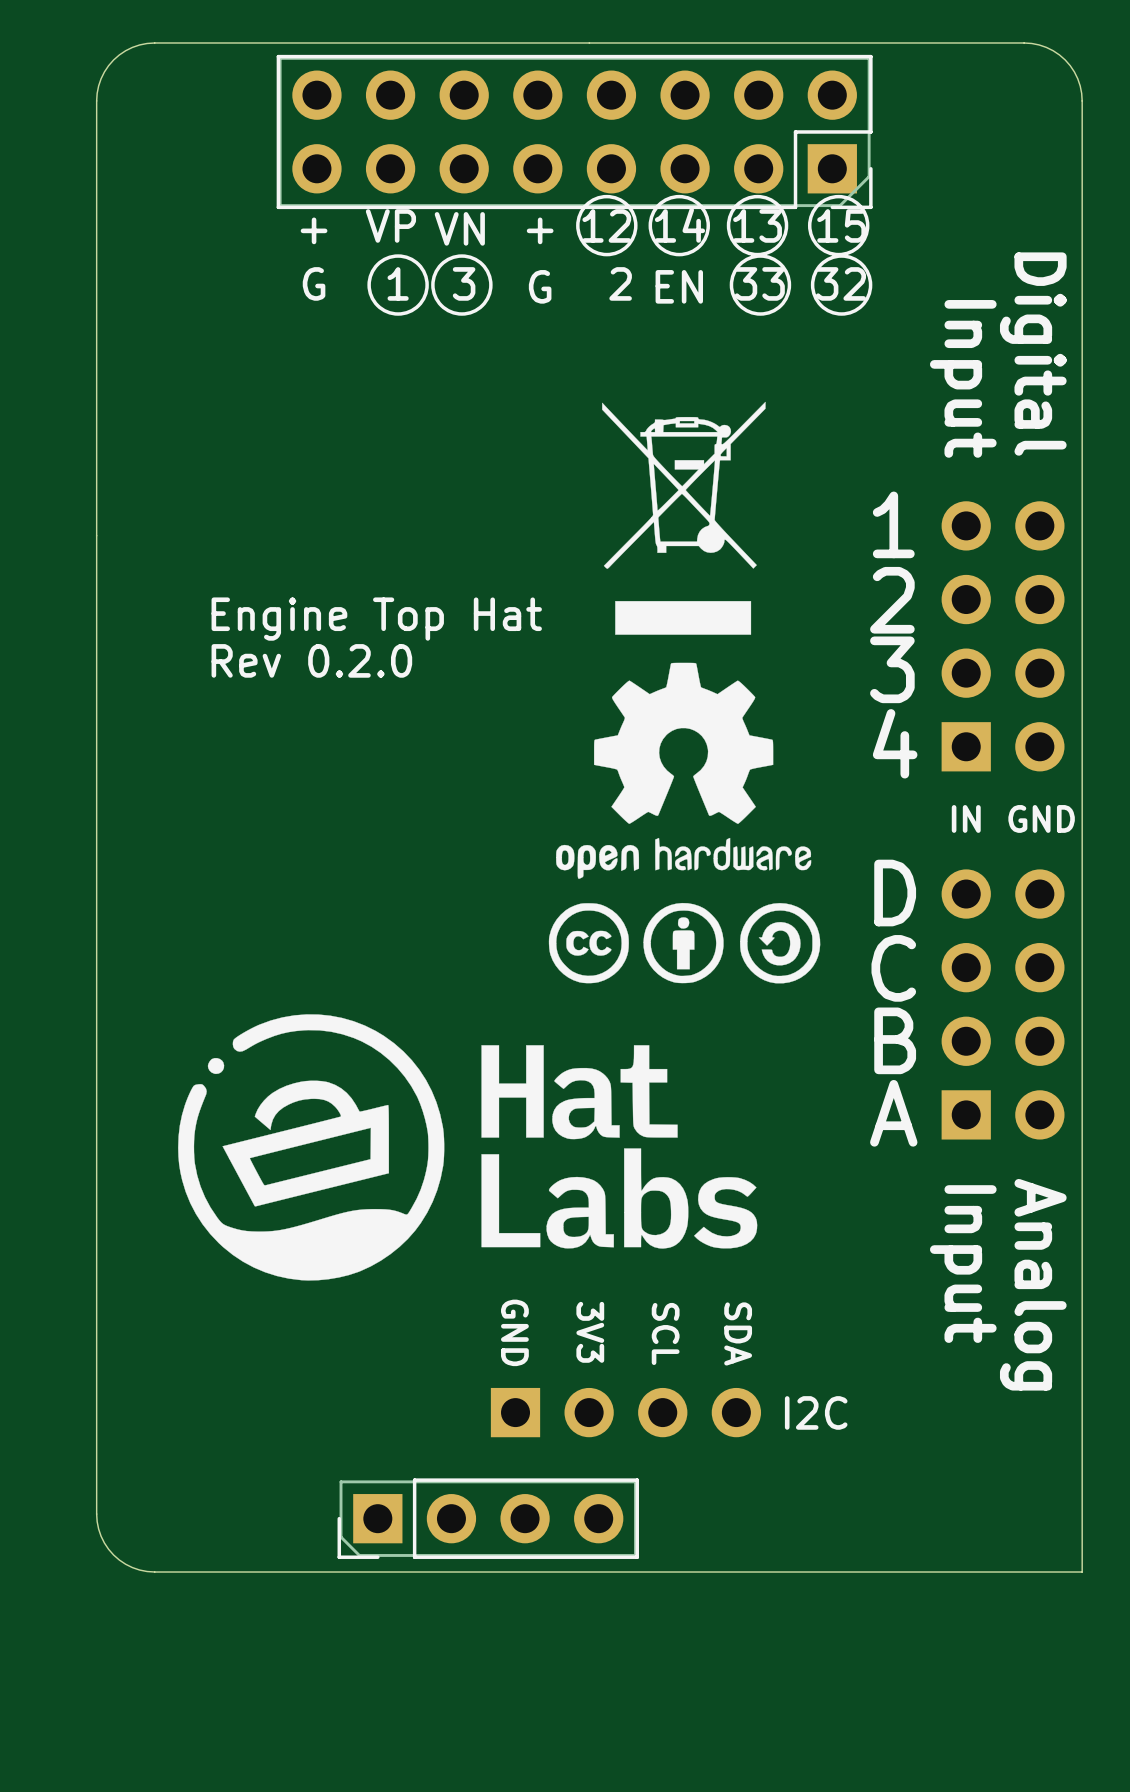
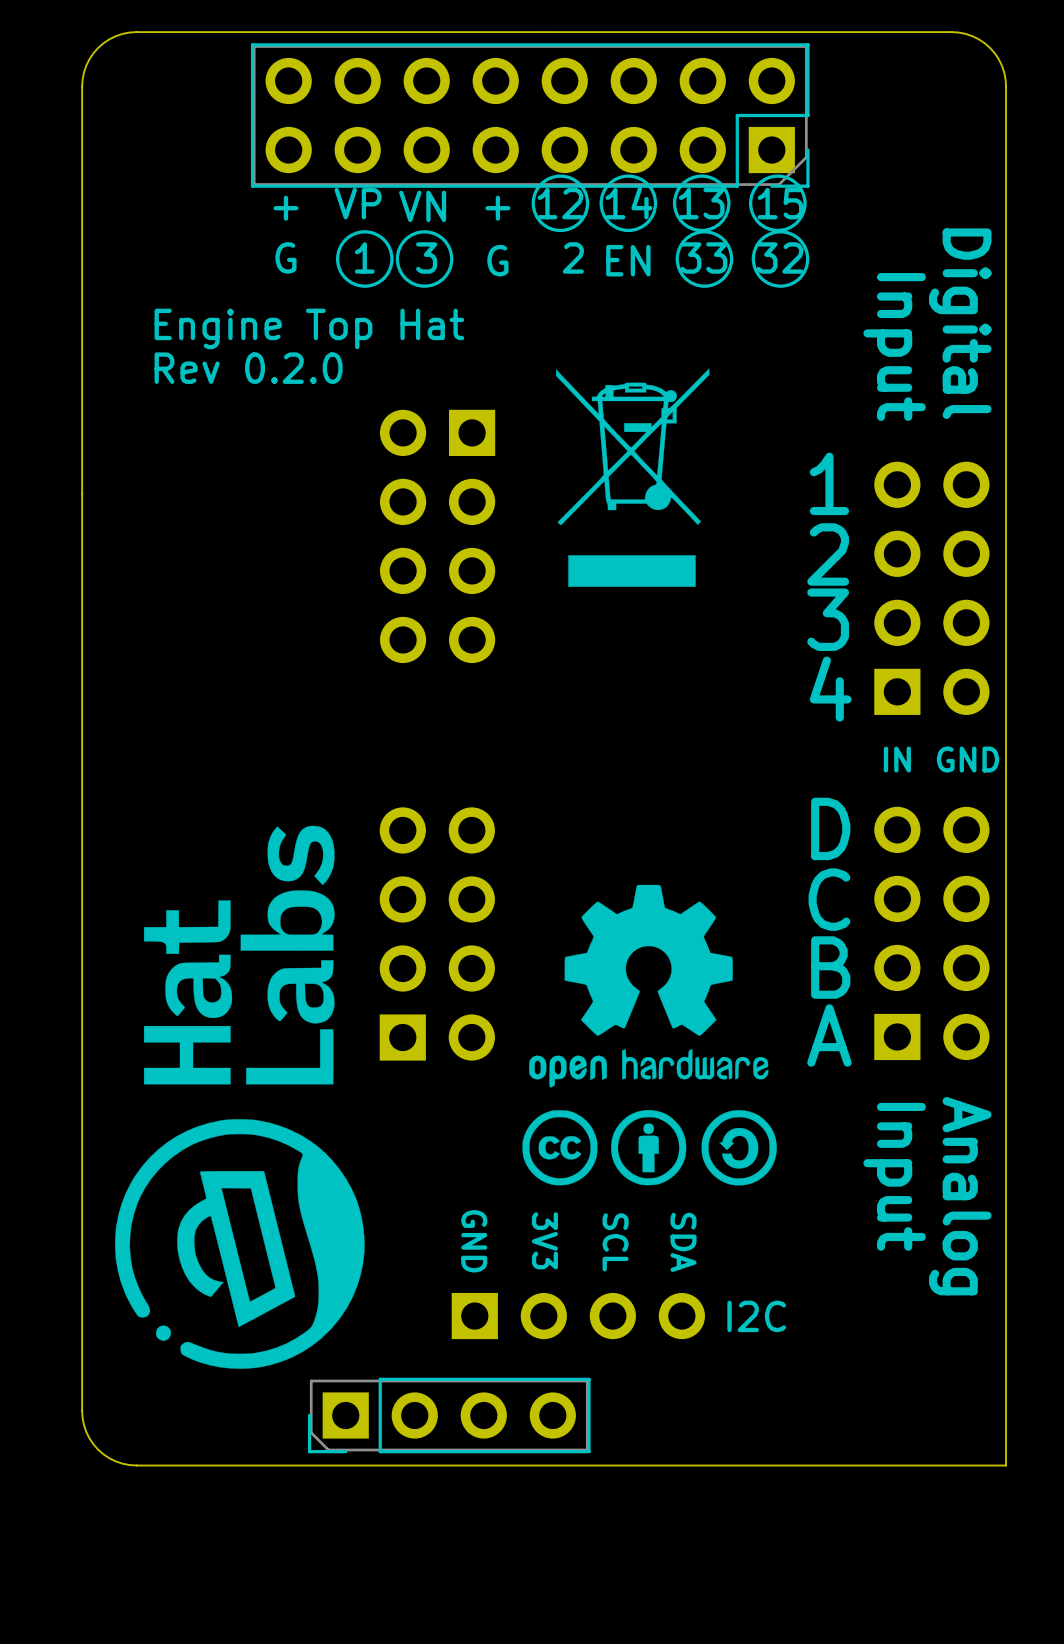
part: none -> (437, 536)
text position: Engine Top Hat (376, 619) -> Engine Top Hat (309, 328)
text position: Rev 0.2.0 (311, 660) -> Rev 0.2.0 (248, 368)
drawing position: (683, 770) -> (648, 986)
drawing: none -> [115, 825, 365, 1369]
drawing position: (684, 943) -> (649, 1147)
part: none -> (437, 933)
drawing: [178, 1014, 758, 1281] -> none

